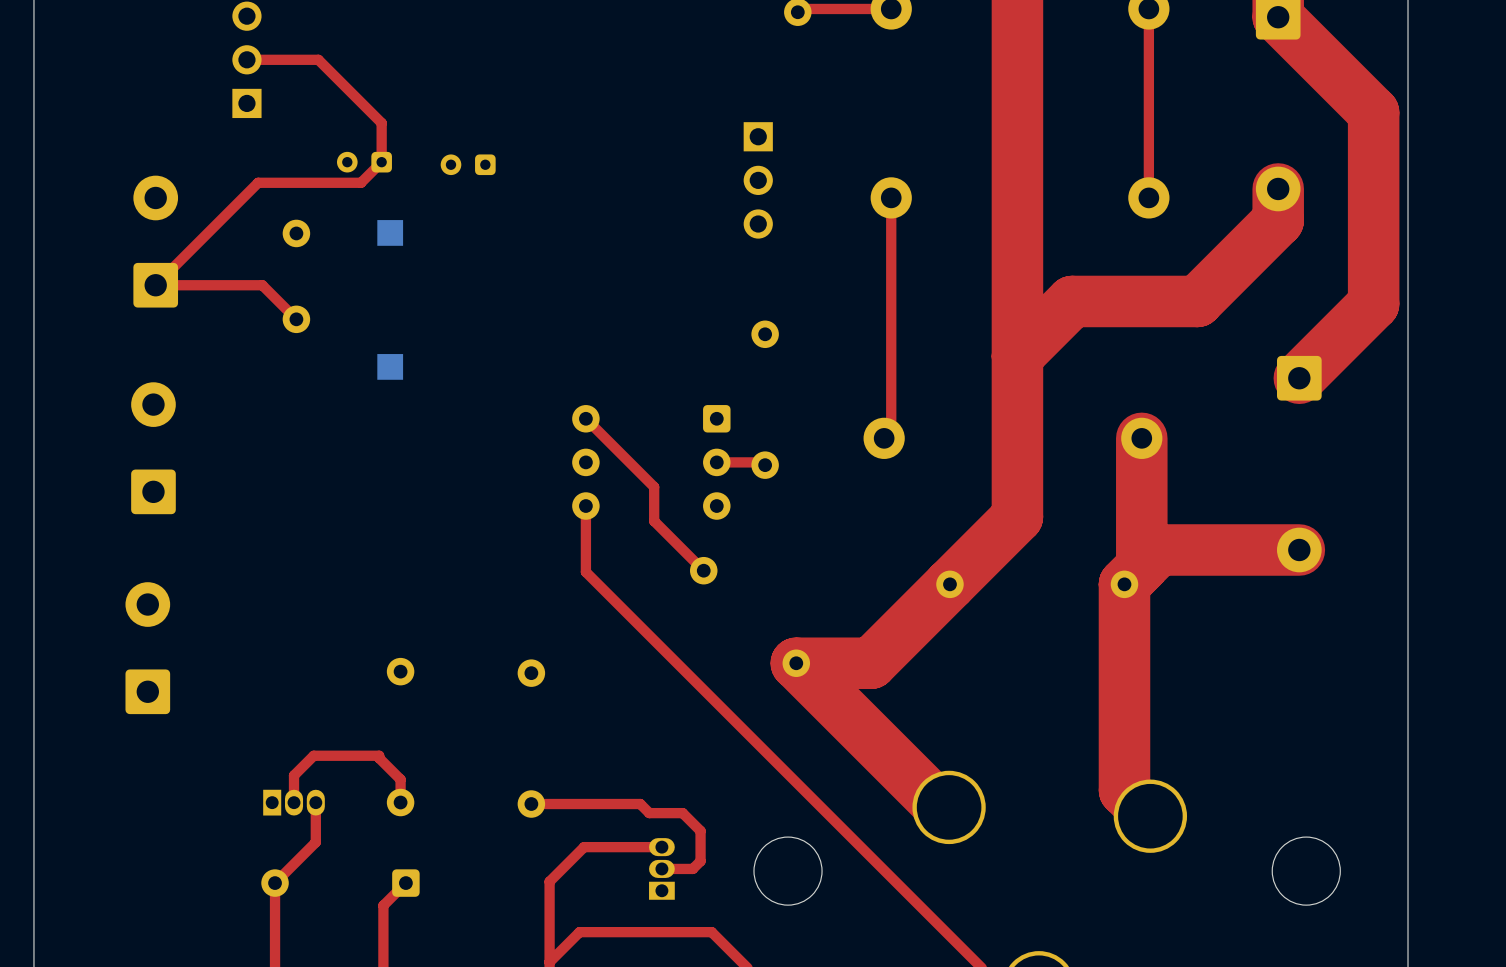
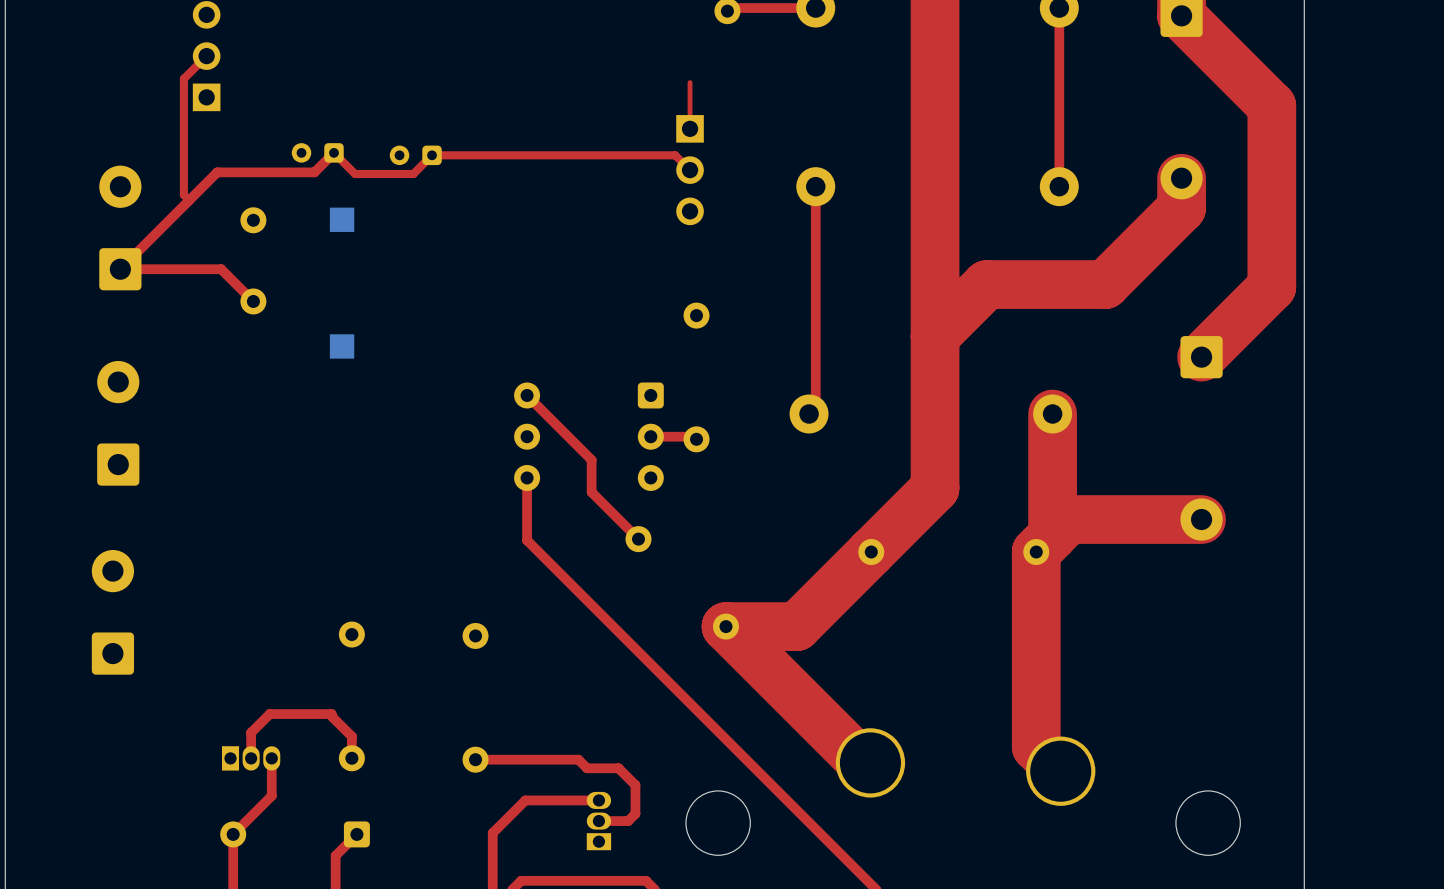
top track: (246, 59) (318, 59) (381, 123) (381, 162) -> (206, 56) (183, 78) (183, 194) (189, 200)
top track: none -> (690, 82) (690, 128)
top track: none -> (333, 152) (355, 174) (413, 174) (432, 155) (675, 155) (690, 170)

